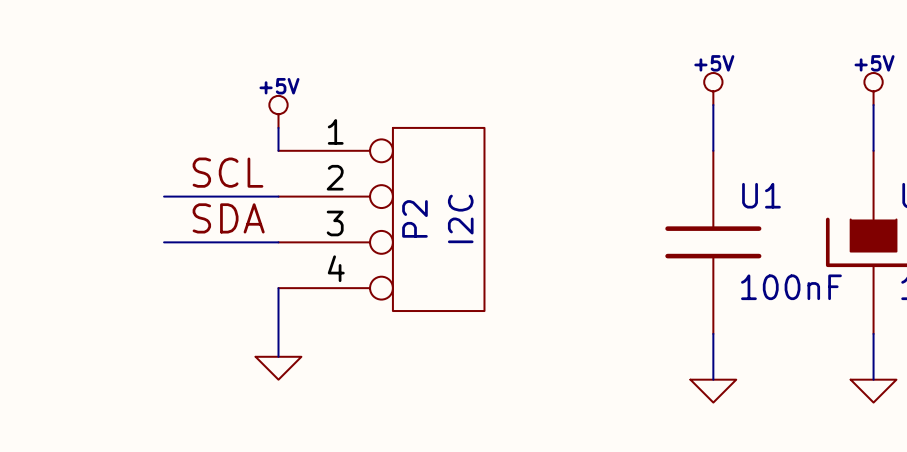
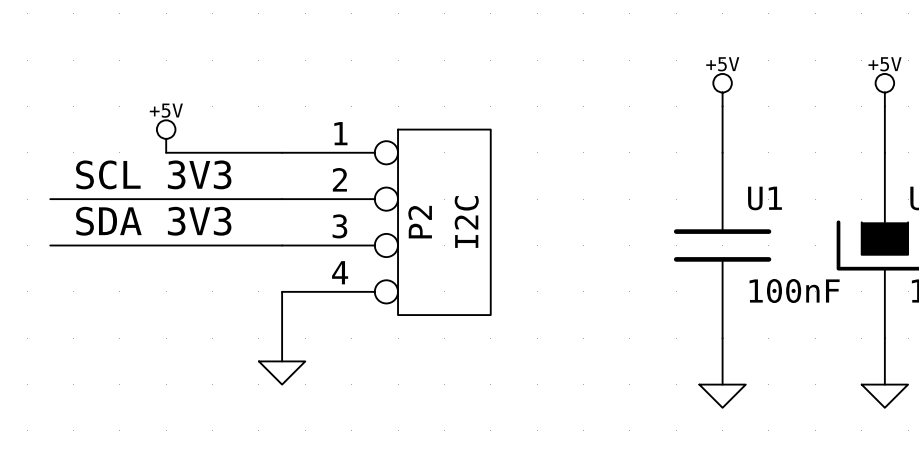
power symbol position: +5V (278, 111) -> +5V (166, 136)
wire: (278, 127) (278, 150) -> (166, 152) (282, 152)
label: none -> SCL 3V3 (153, 174)
label: SCL (227, 172) -> none
wire: none -> (50, 199) (166, 199)
label: none -> SDA 3V3 (153, 221)
label: SDA (228, 218) -> none
wire: none -> (50, 245) (166, 245)

